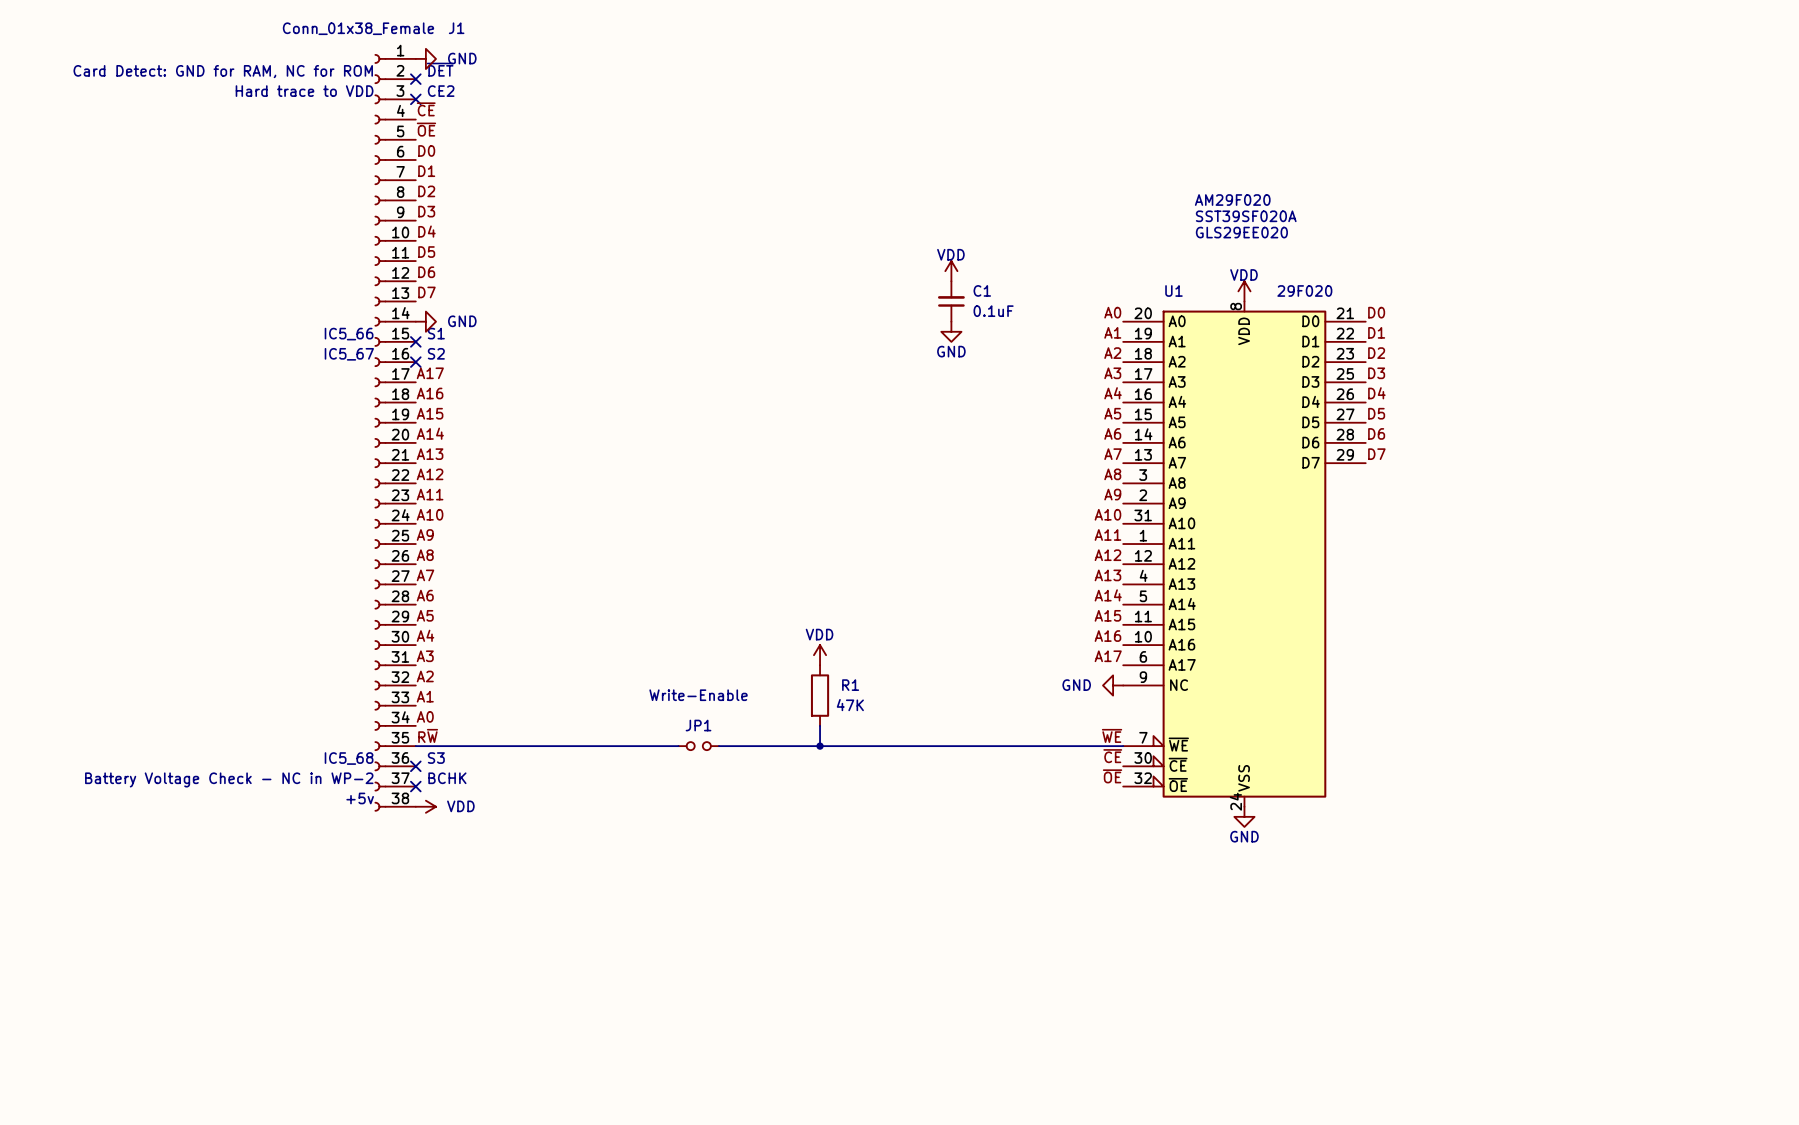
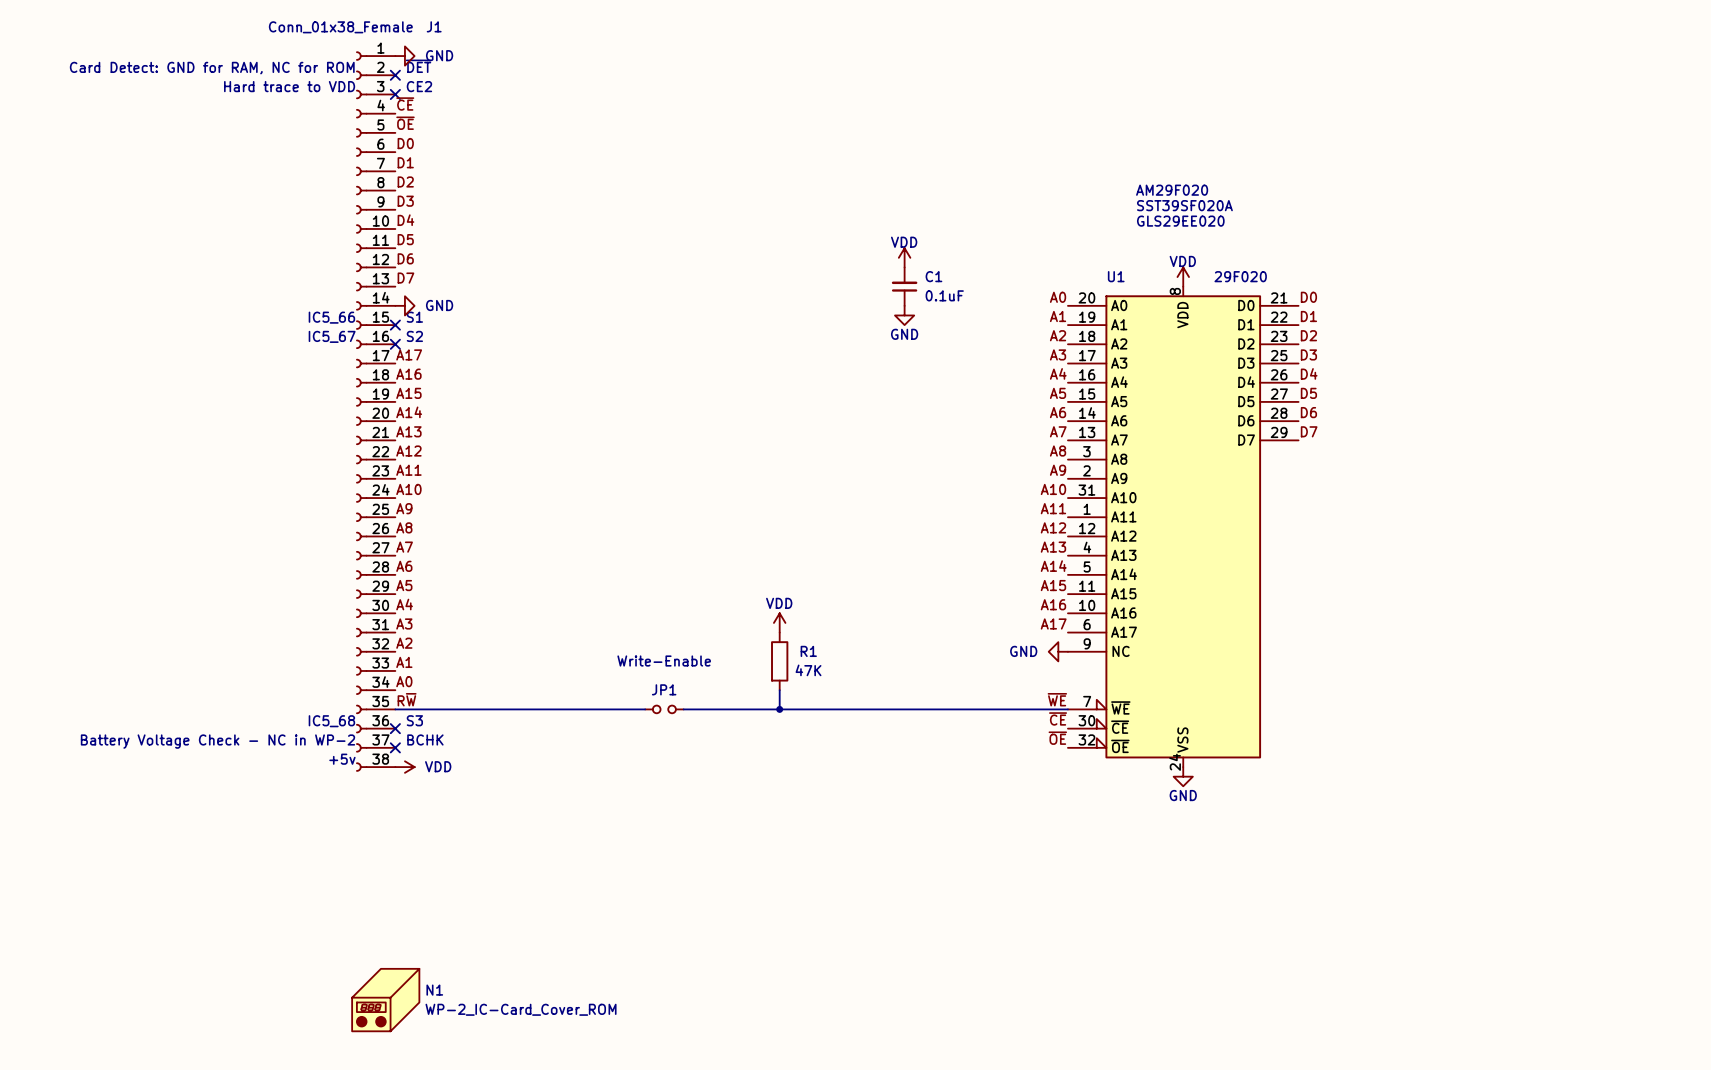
N1: none -> WP-2_IC-Card_Cover_ROM (385, 1000)

